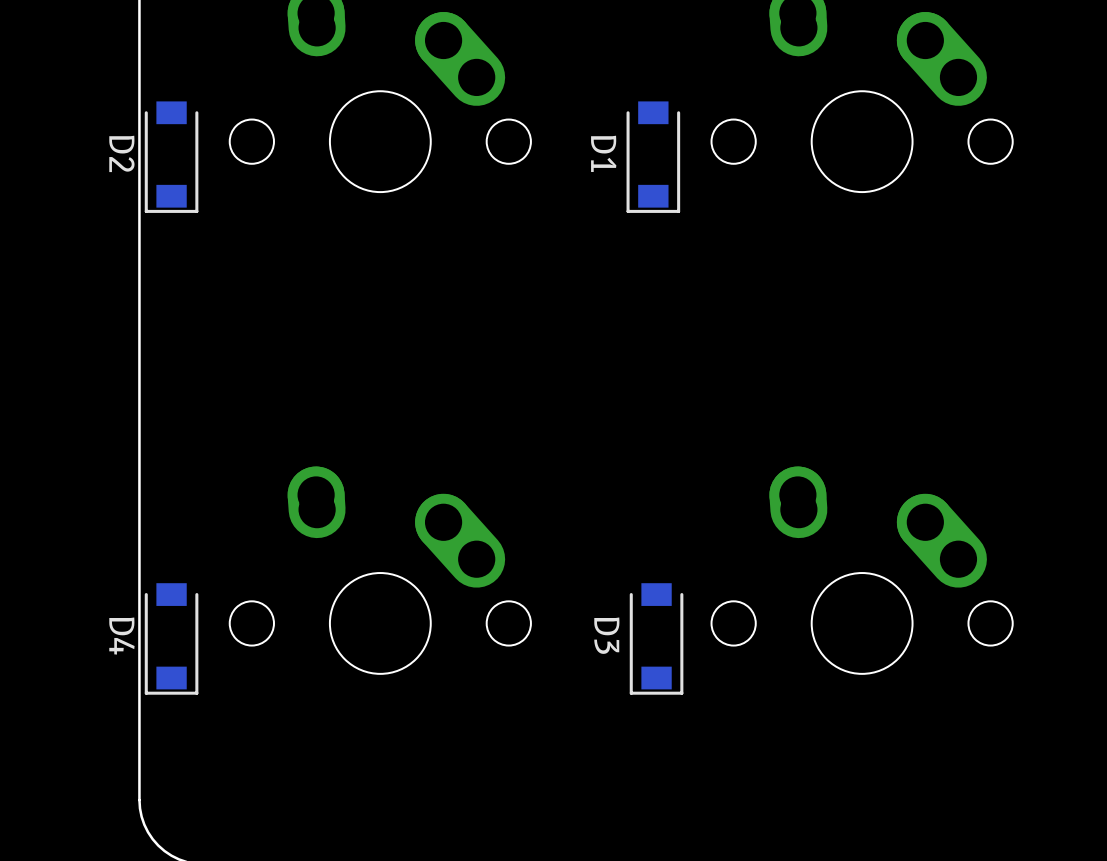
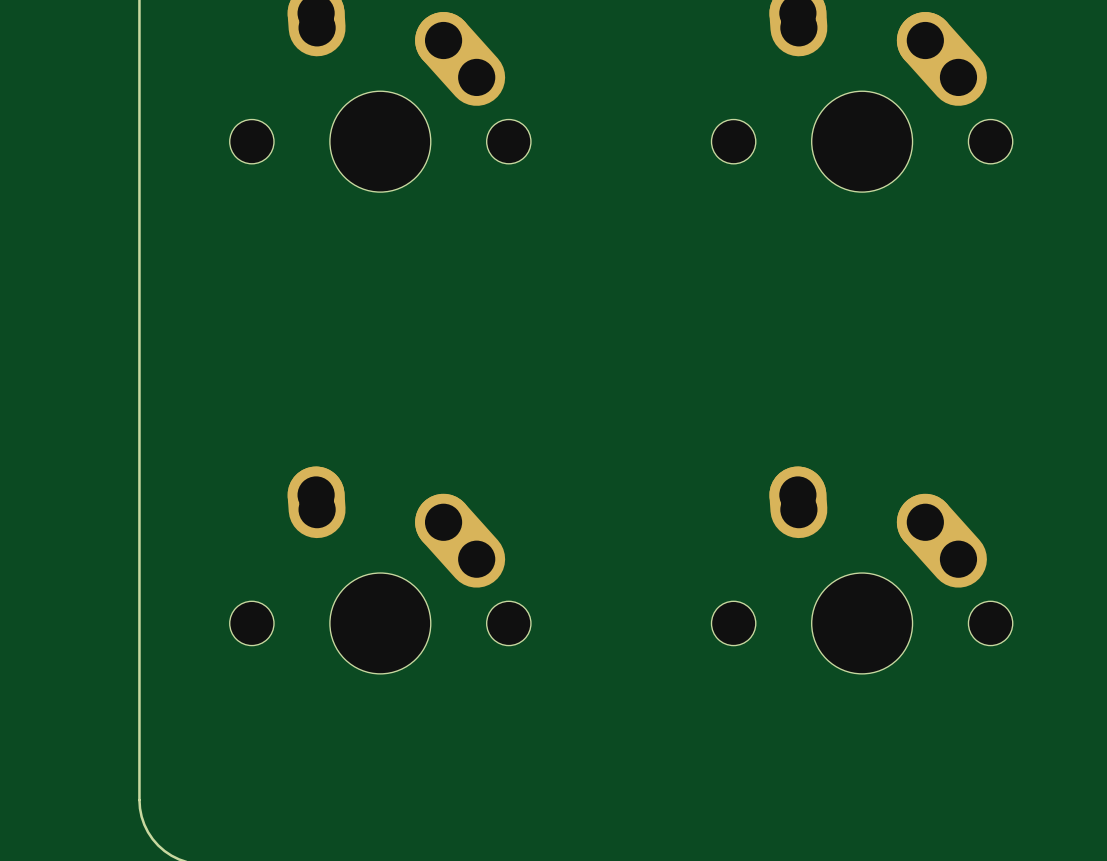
D2: (171, 157) -> none
D1: (653, 157) -> none
D4: (171, 638) -> none
D3: (656, 638) -> none

